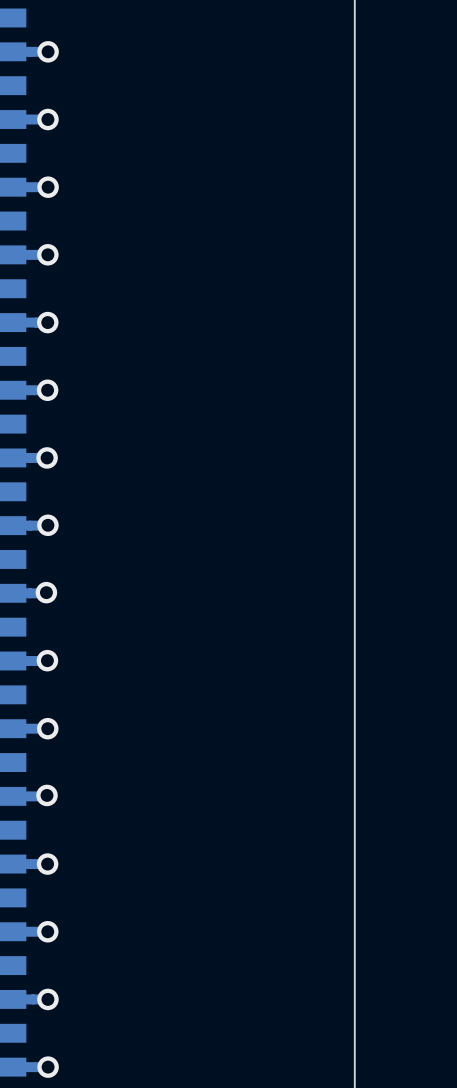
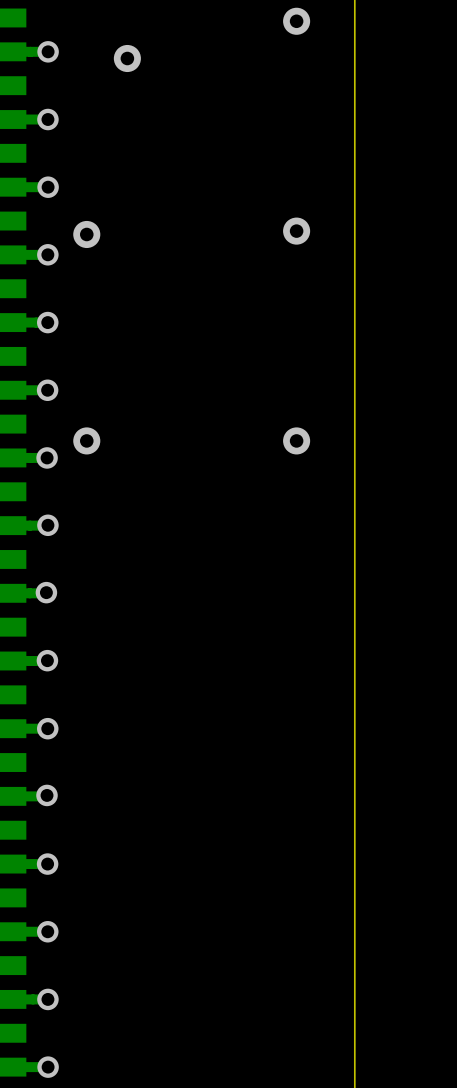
via: none -> (296, 21)
via: none -> (127, 58)
via: none -> (296, 231)
via: none -> (86, 234)
via: none -> (86, 440)
via: none -> (296, 440)

